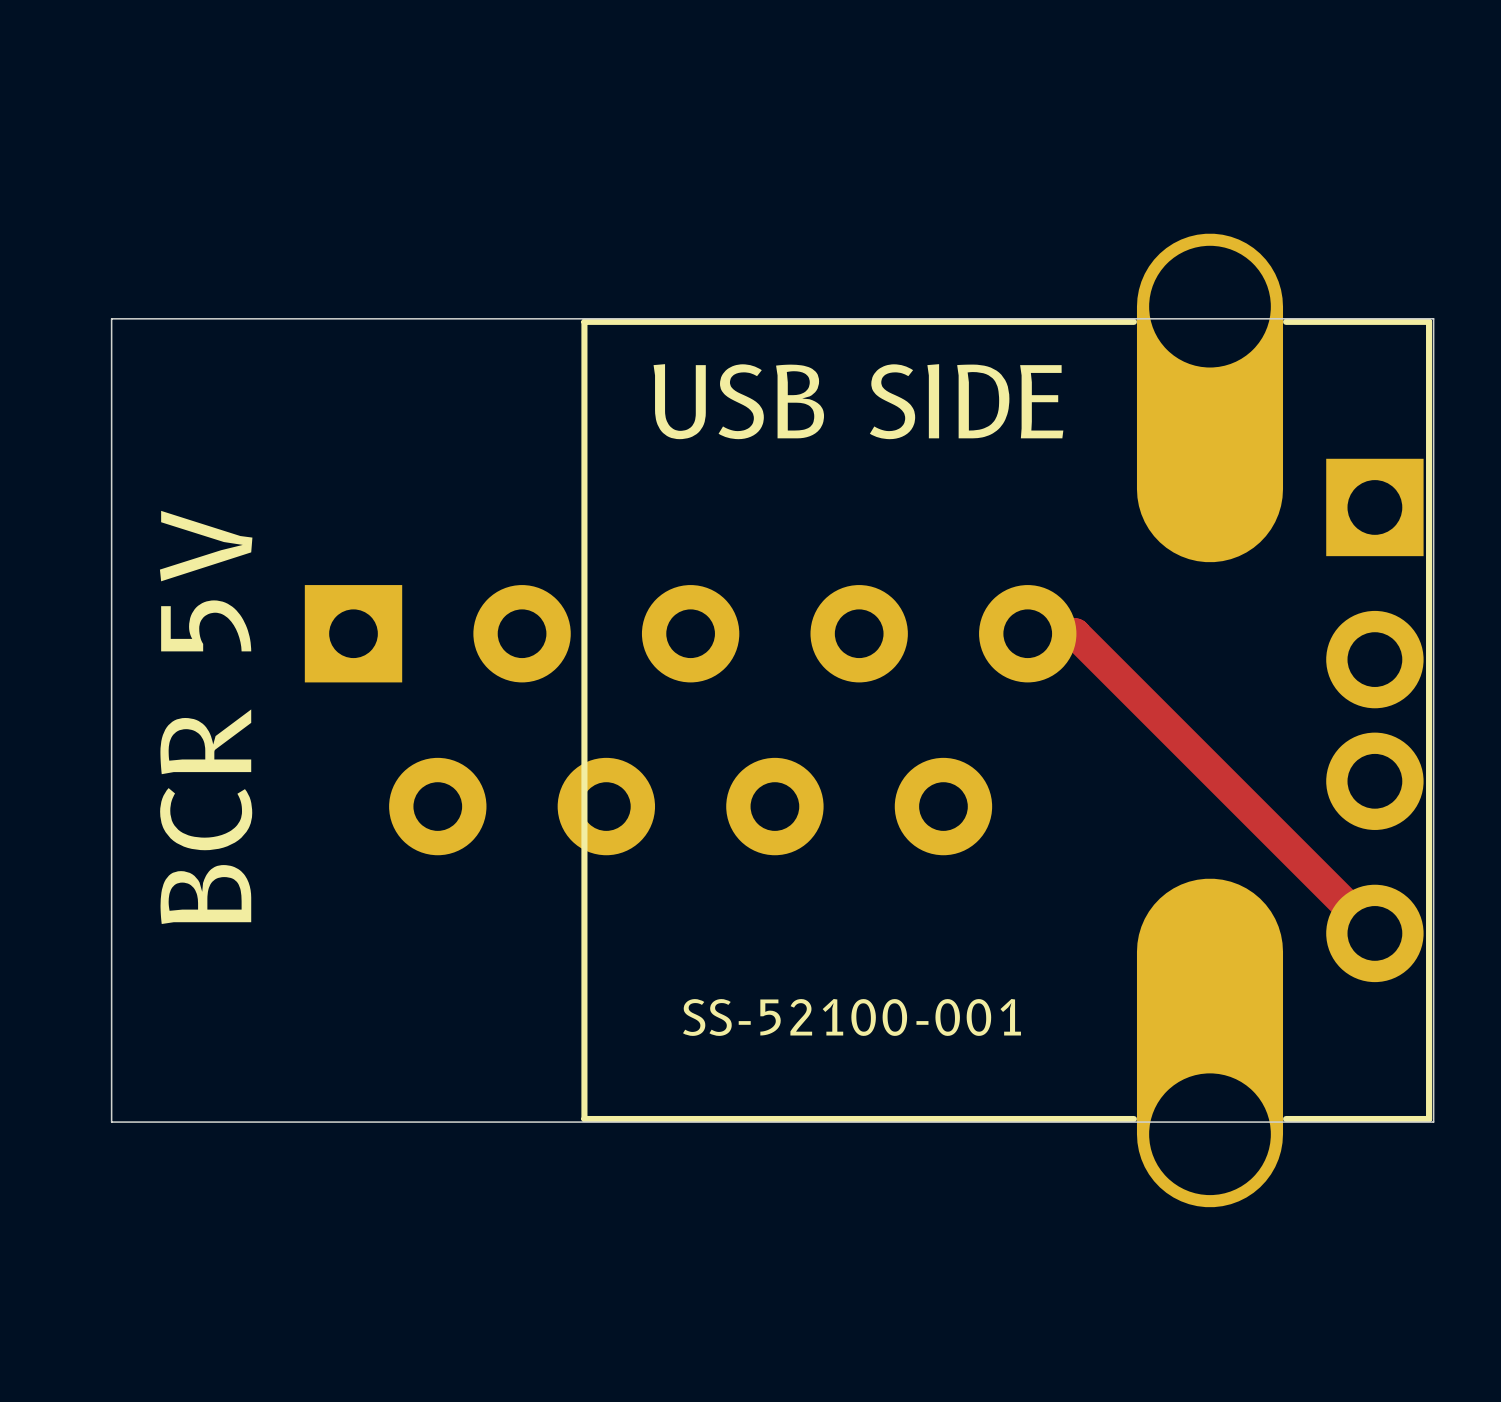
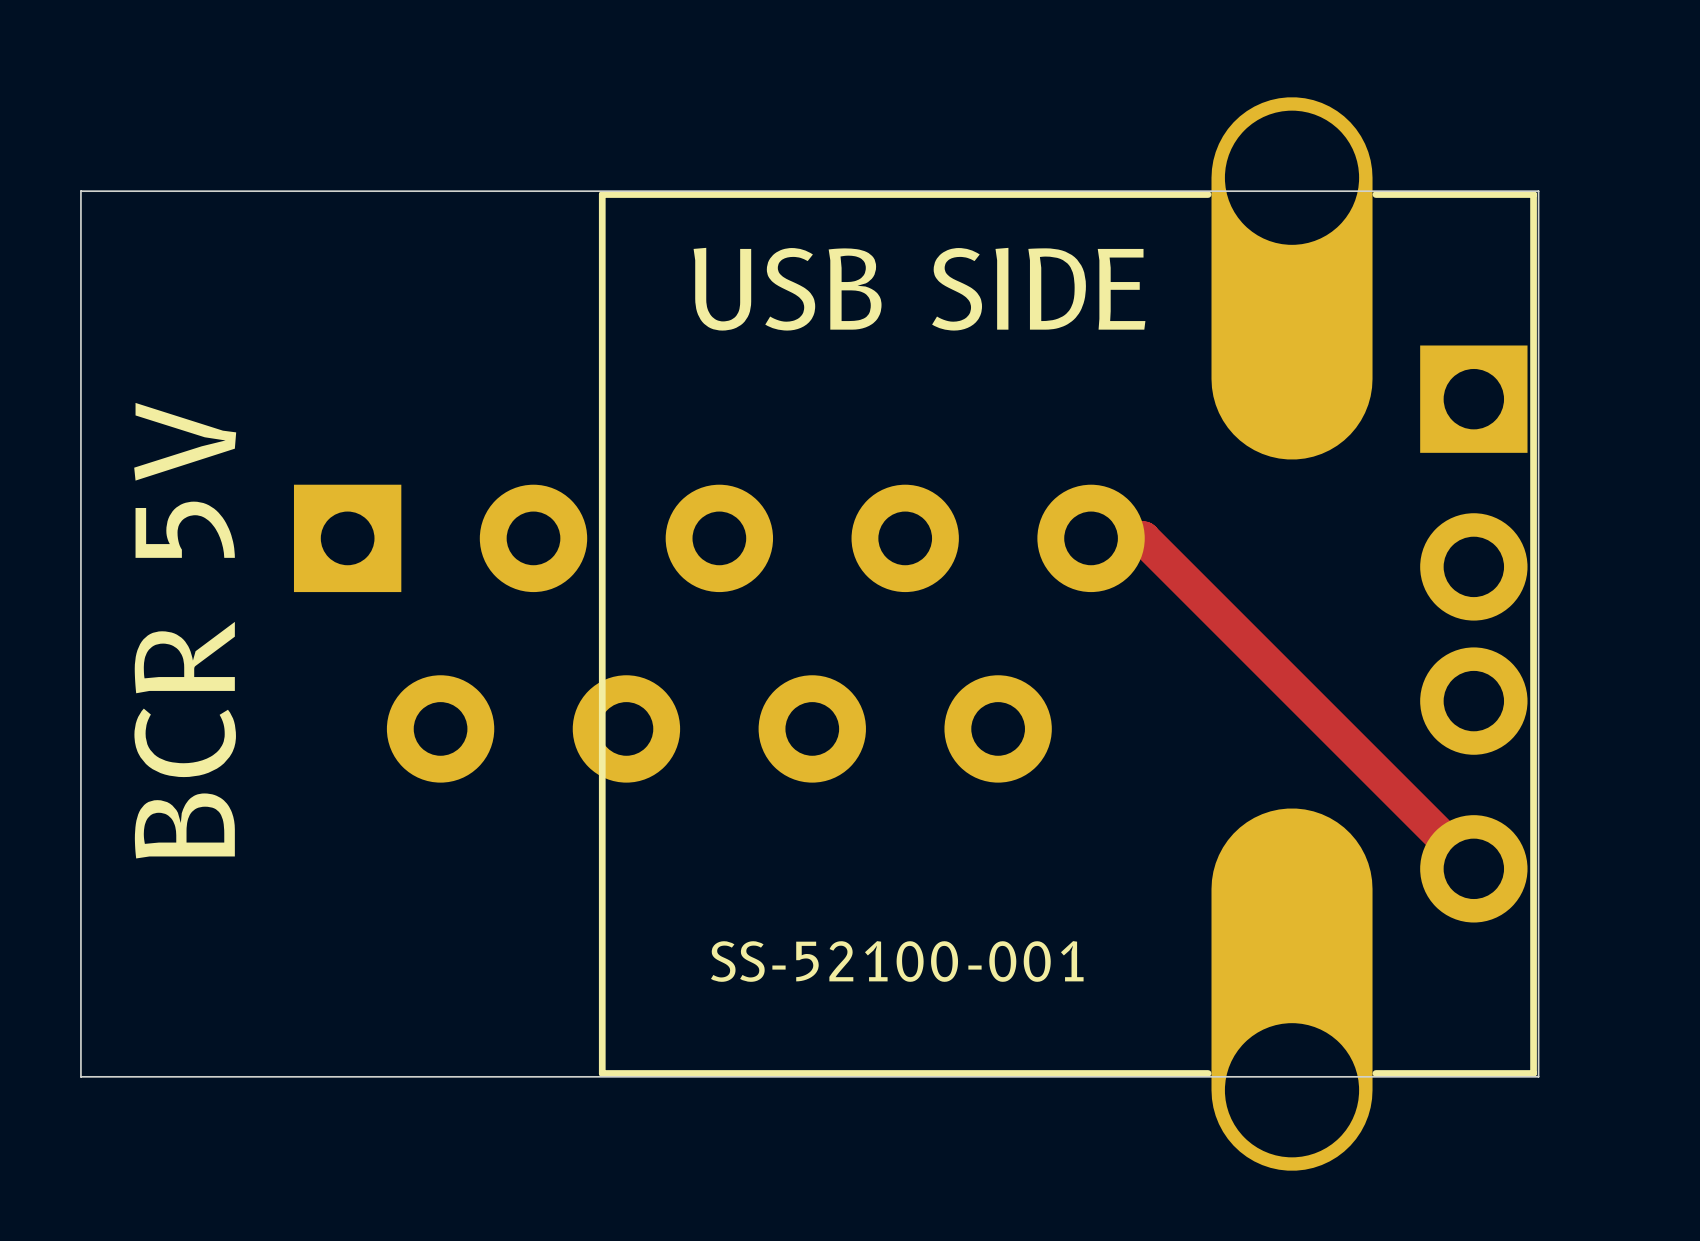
text position: USB SIDE (858, 401) -> USB SIDE (919, 289)

